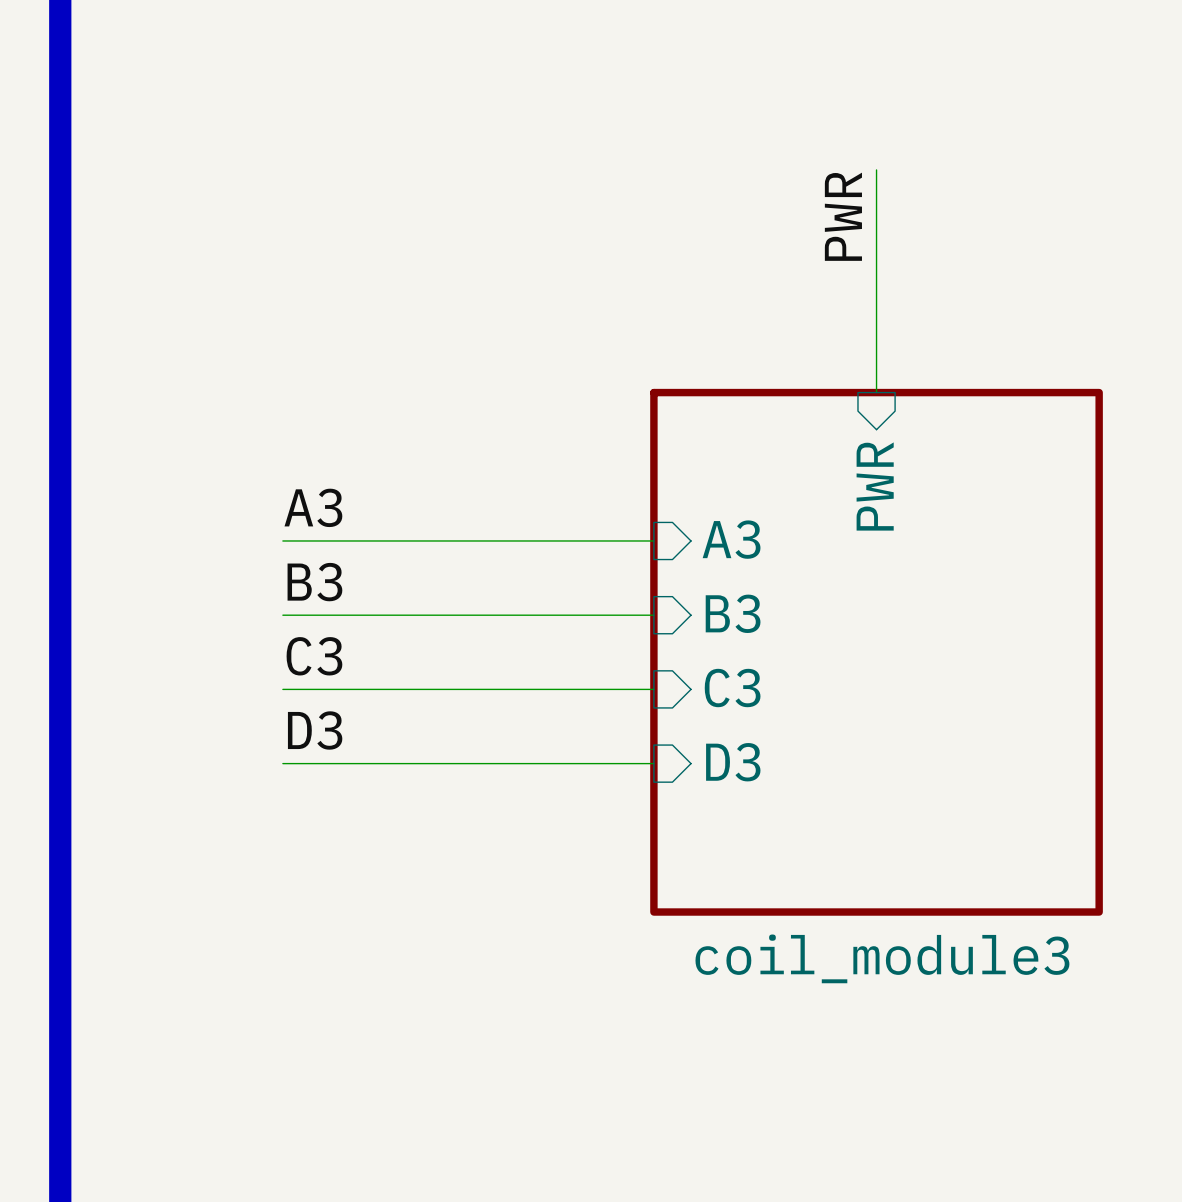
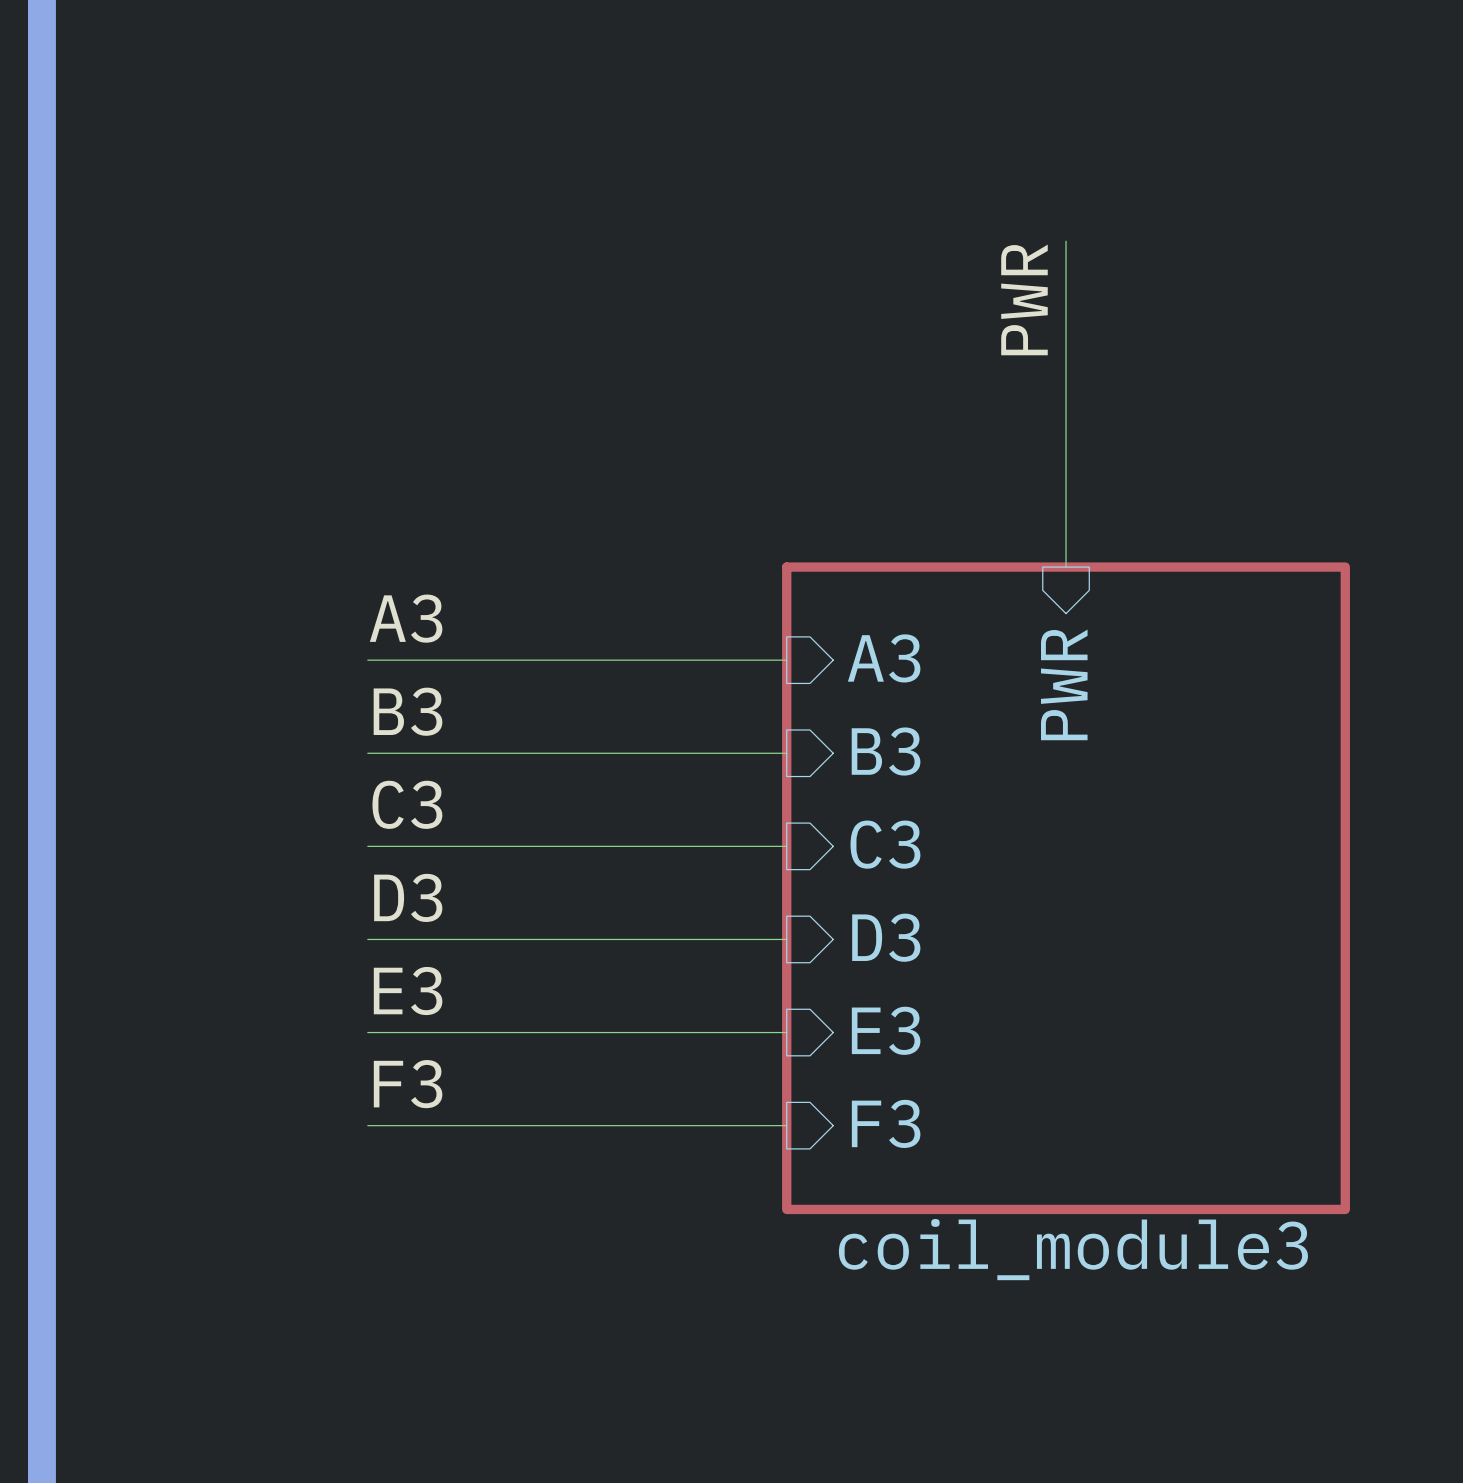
wire: (876, 169) (876, 207) -> none
label position: PWR (843, 216) -> PWR (1024, 299)
sheet coil_module3 shape: [650, 388, 1103, 916] -> [782, 562, 1350, 1215]
wire: none -> (1066, 473) (1066, 567)
sheet pin position: PWR (875, 486) -> PWR (1064, 684)
label position: A3 (313, 507) -> A3 (406, 618)
wire: (282, 540) (319, 540) -> none
label position: B3 (314, 582) -> B3 (408, 711)
wire: (282, 615) (319, 615) -> none
label position: C3 (314, 656) -> C3 (407, 804)
wire: (282, 689) (319, 689) -> none
label position: D3 (315, 730) -> D3 (408, 897)
wire: (282, 763) (319, 763) -> none
label: none -> E3 (408, 991)
sheet pin: none -> E3 (886, 1030)
wire: none -> (367, 1032) (786, 1032)
label: none -> F3 (408, 1084)
sheet pin: none -> F3 (886, 1123)
wire: none -> (367, 1125) (786, 1125)

